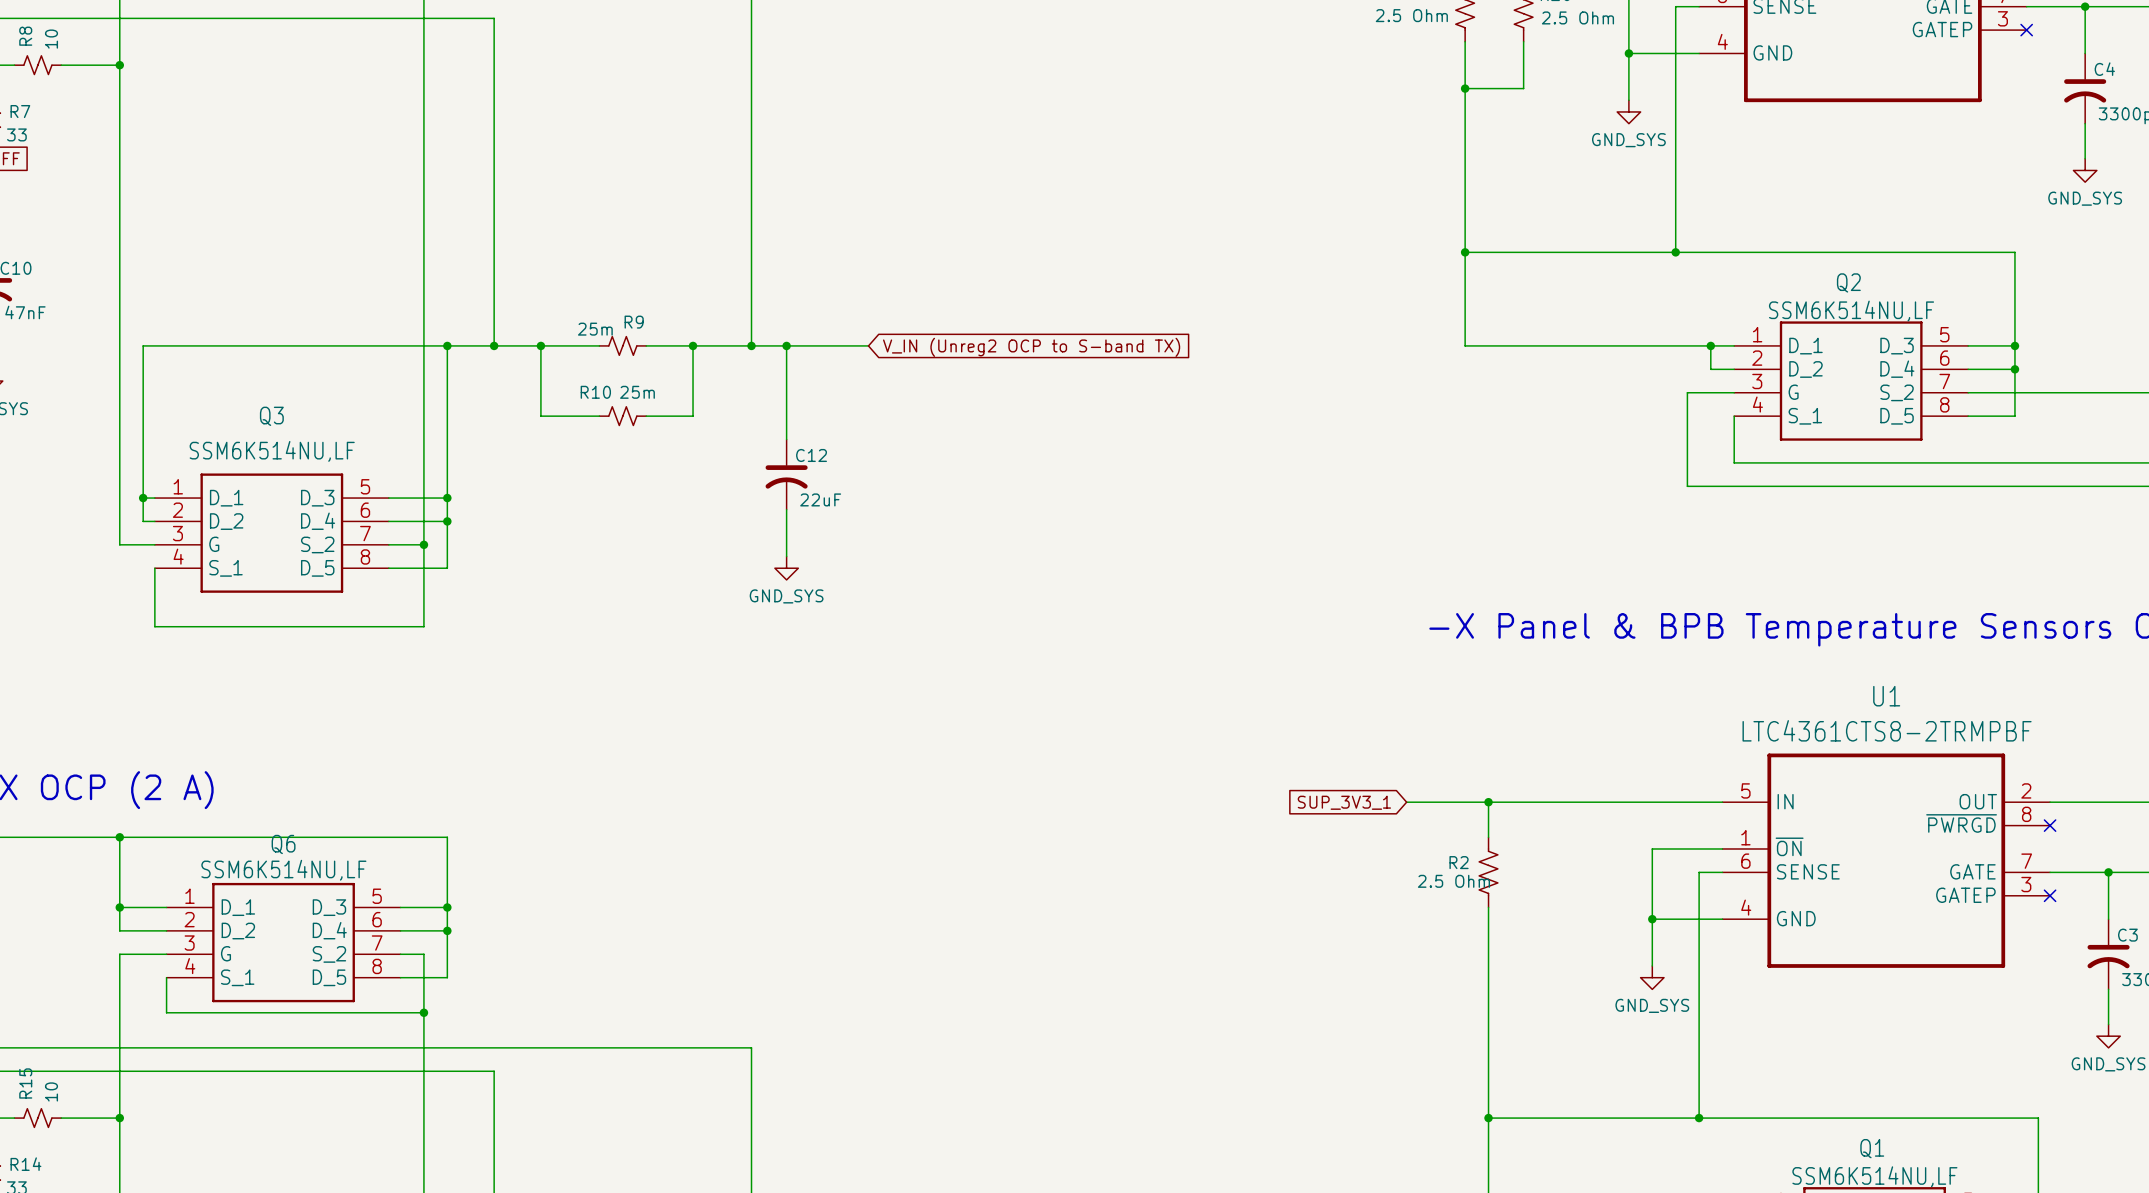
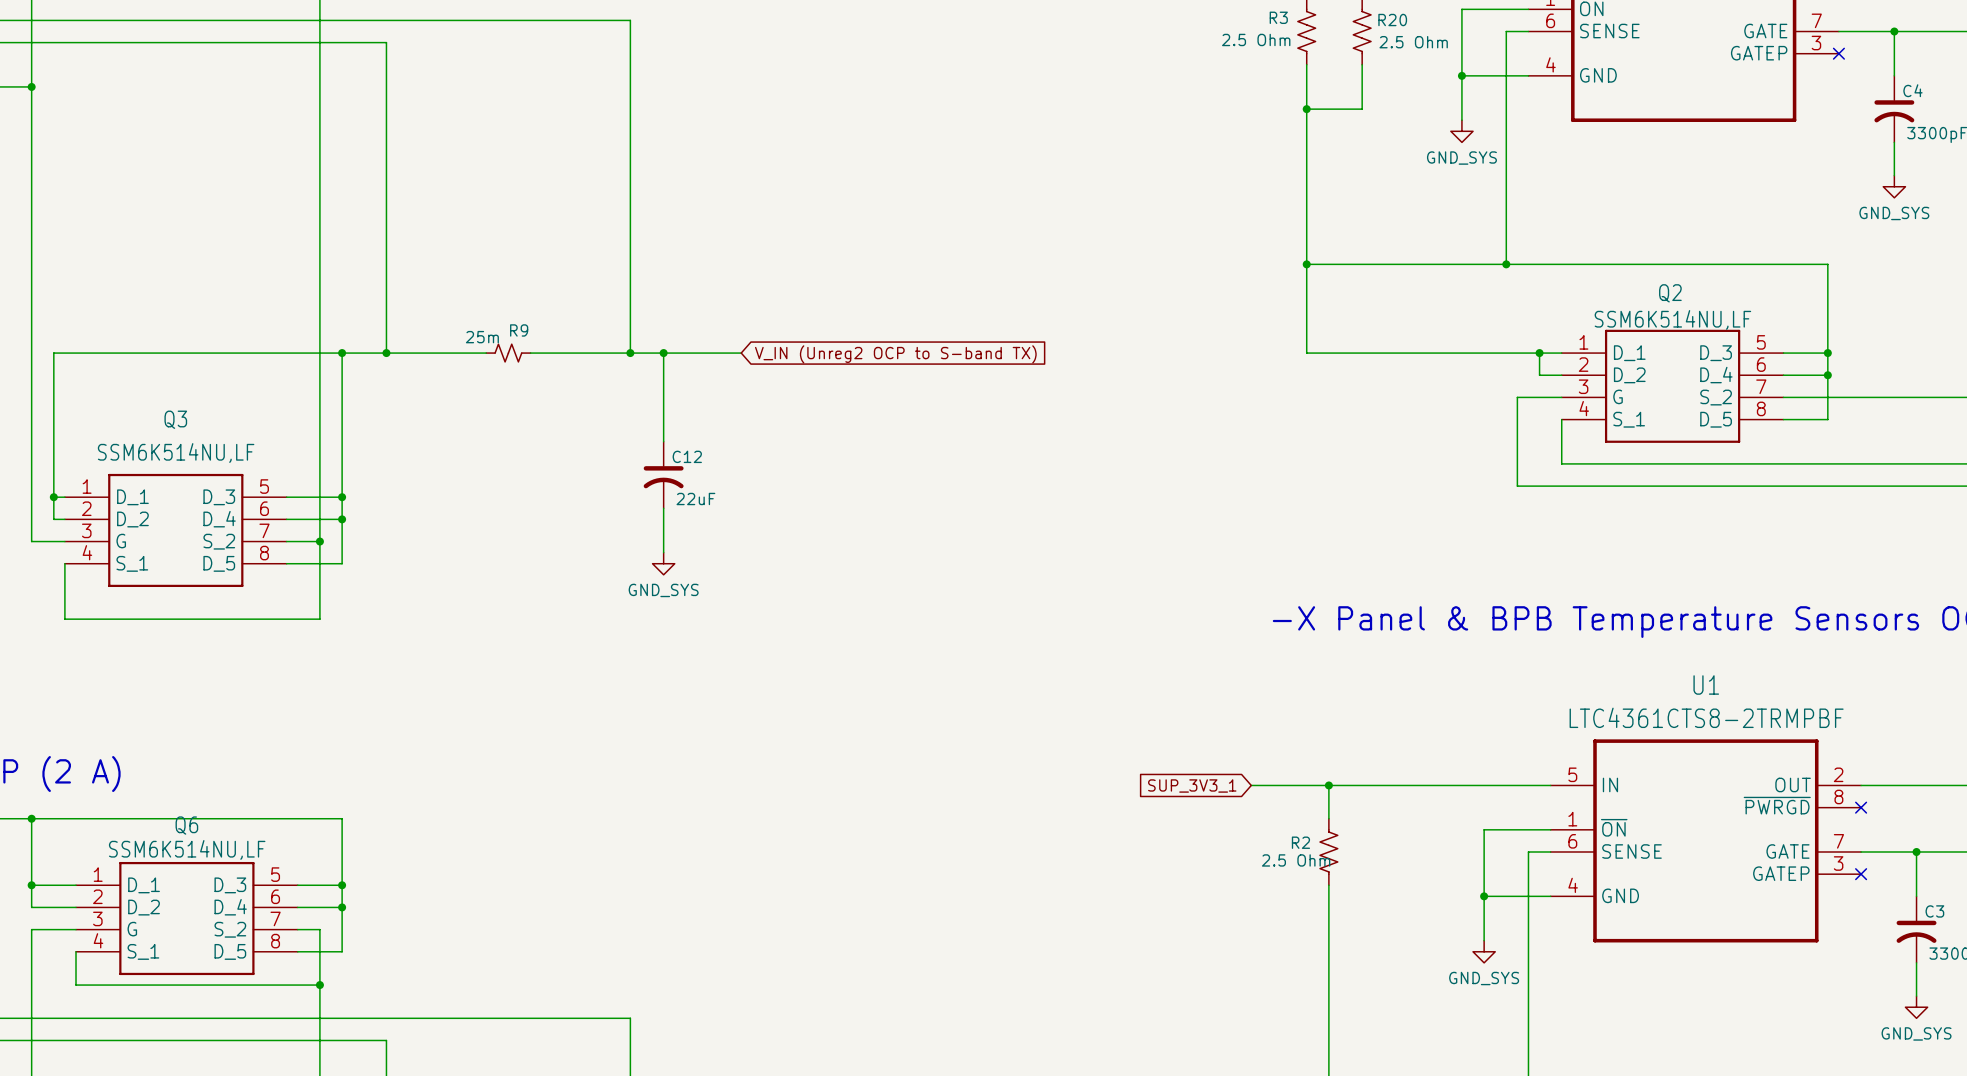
wire: (540, 345) (540, 416) (599, 416) -> none
junction: (540, 345) -> none
wire: (693, 345) (693, 416) (646, 416) -> none
junction: (693, 345) -> none
R10: 25m (622, 416) -> none

